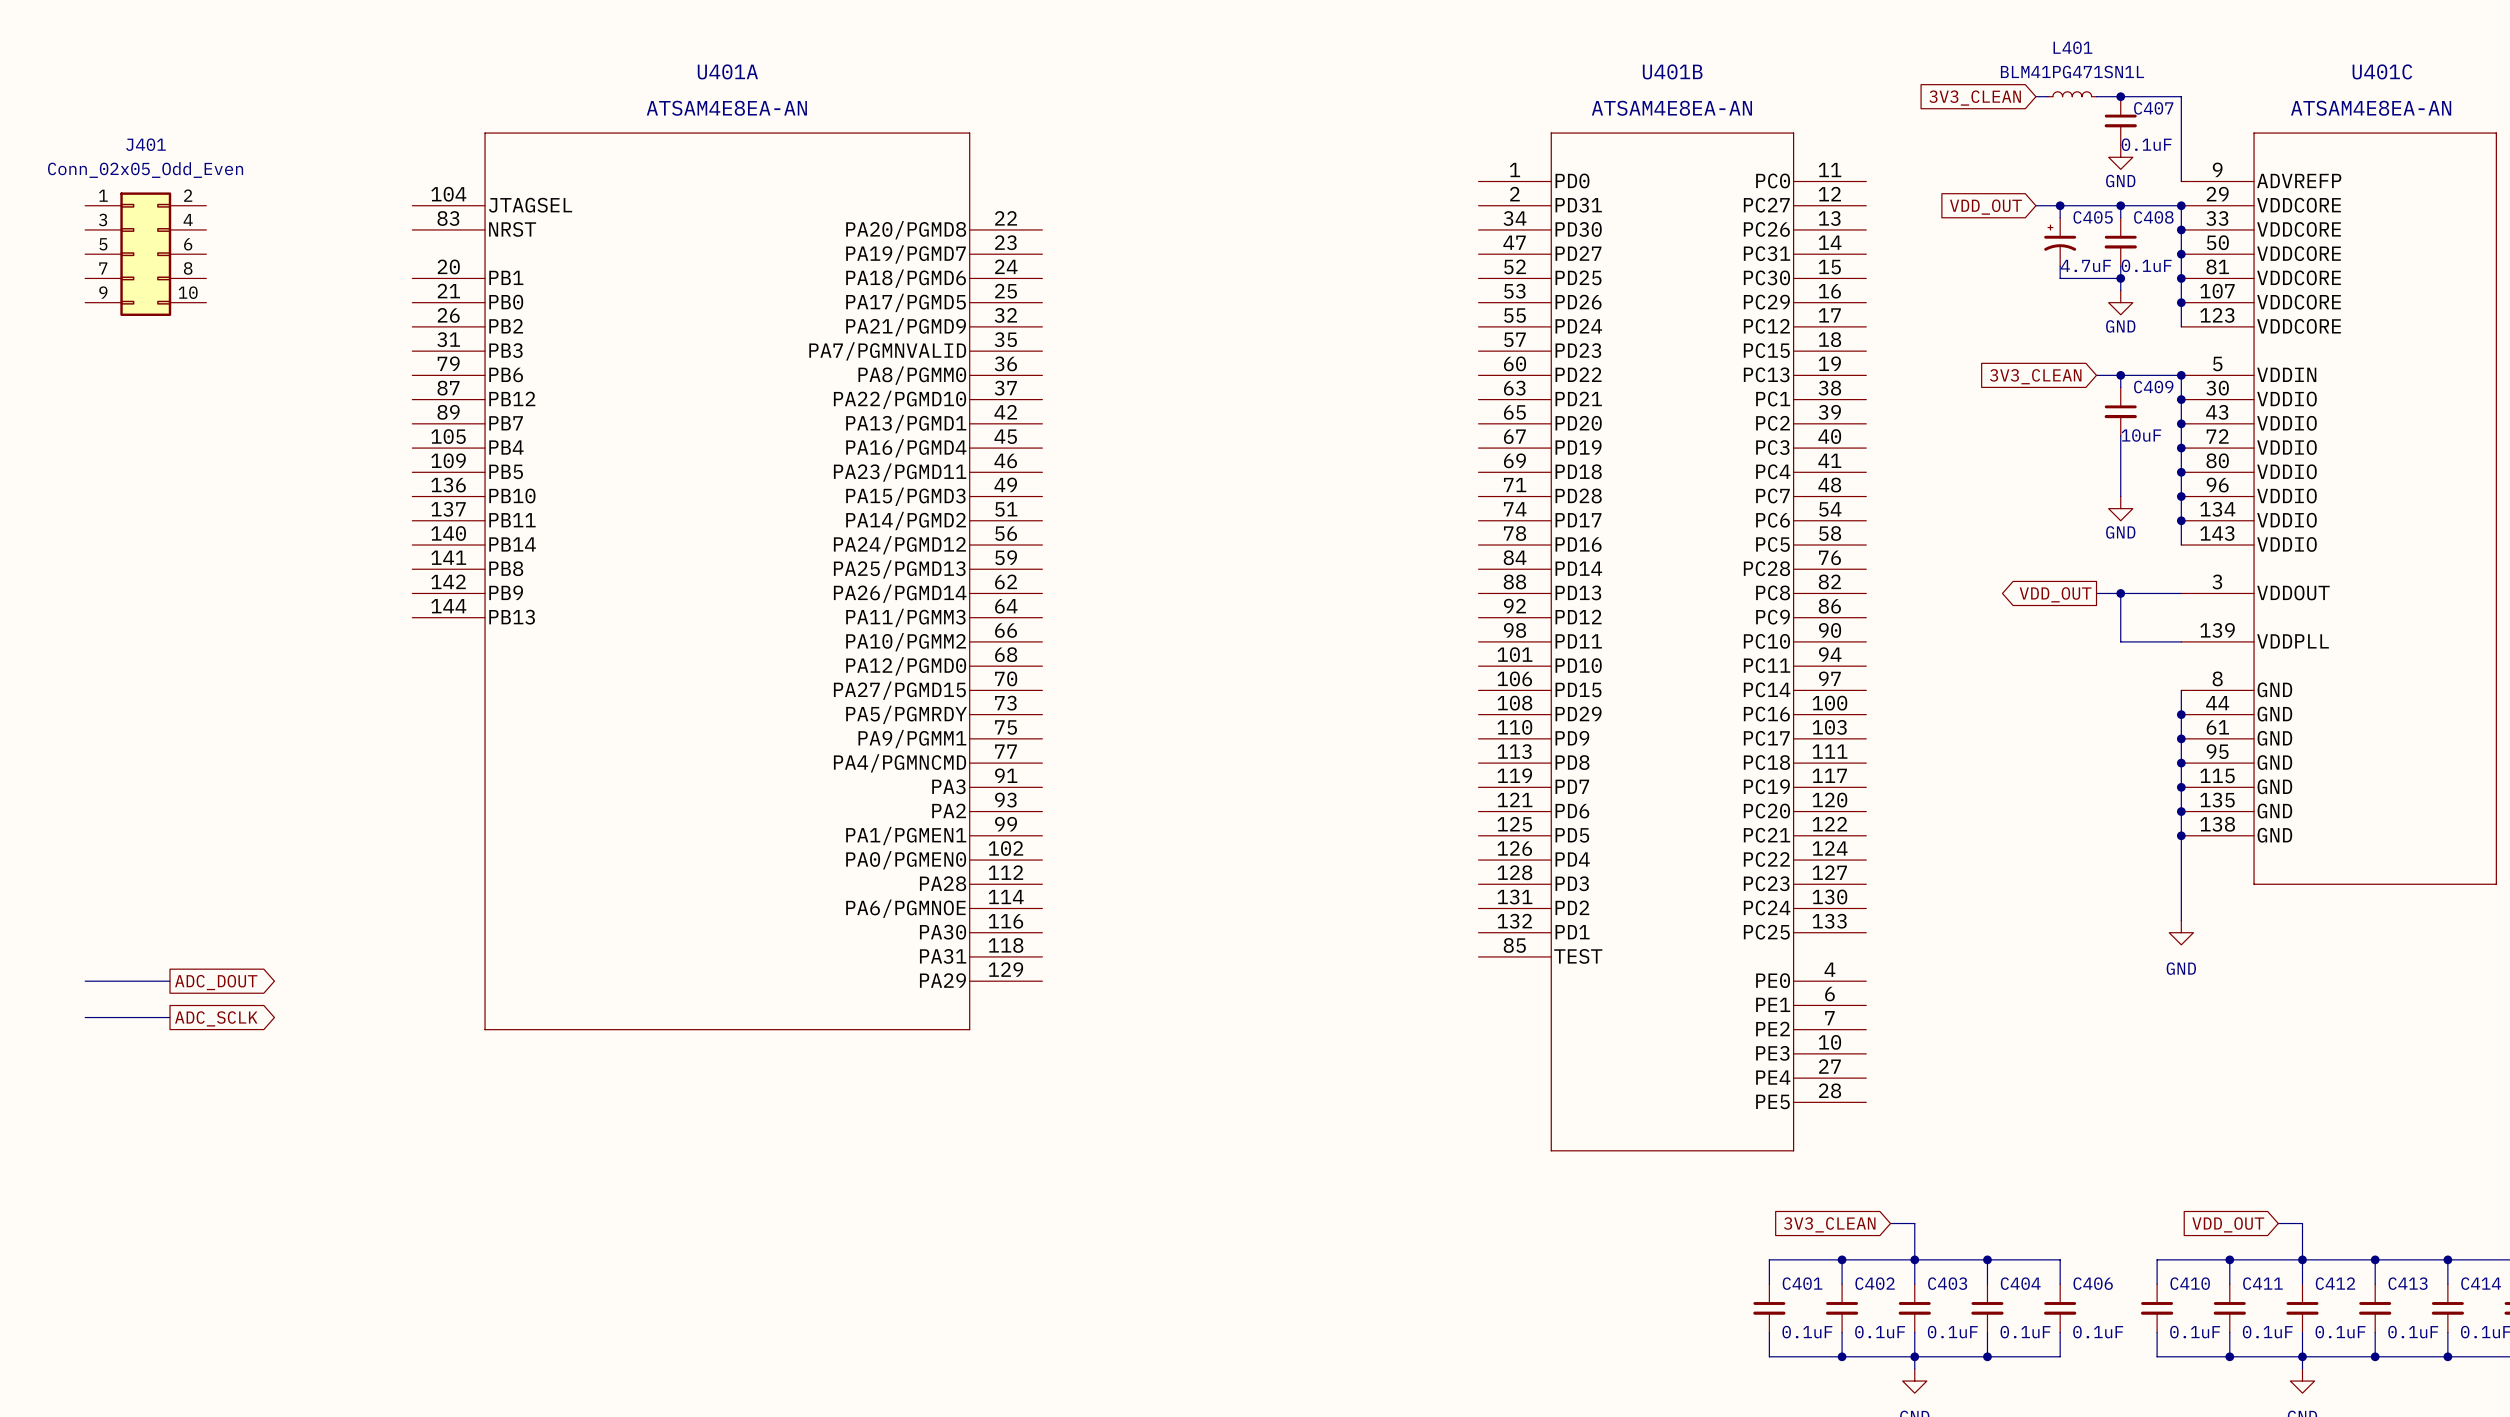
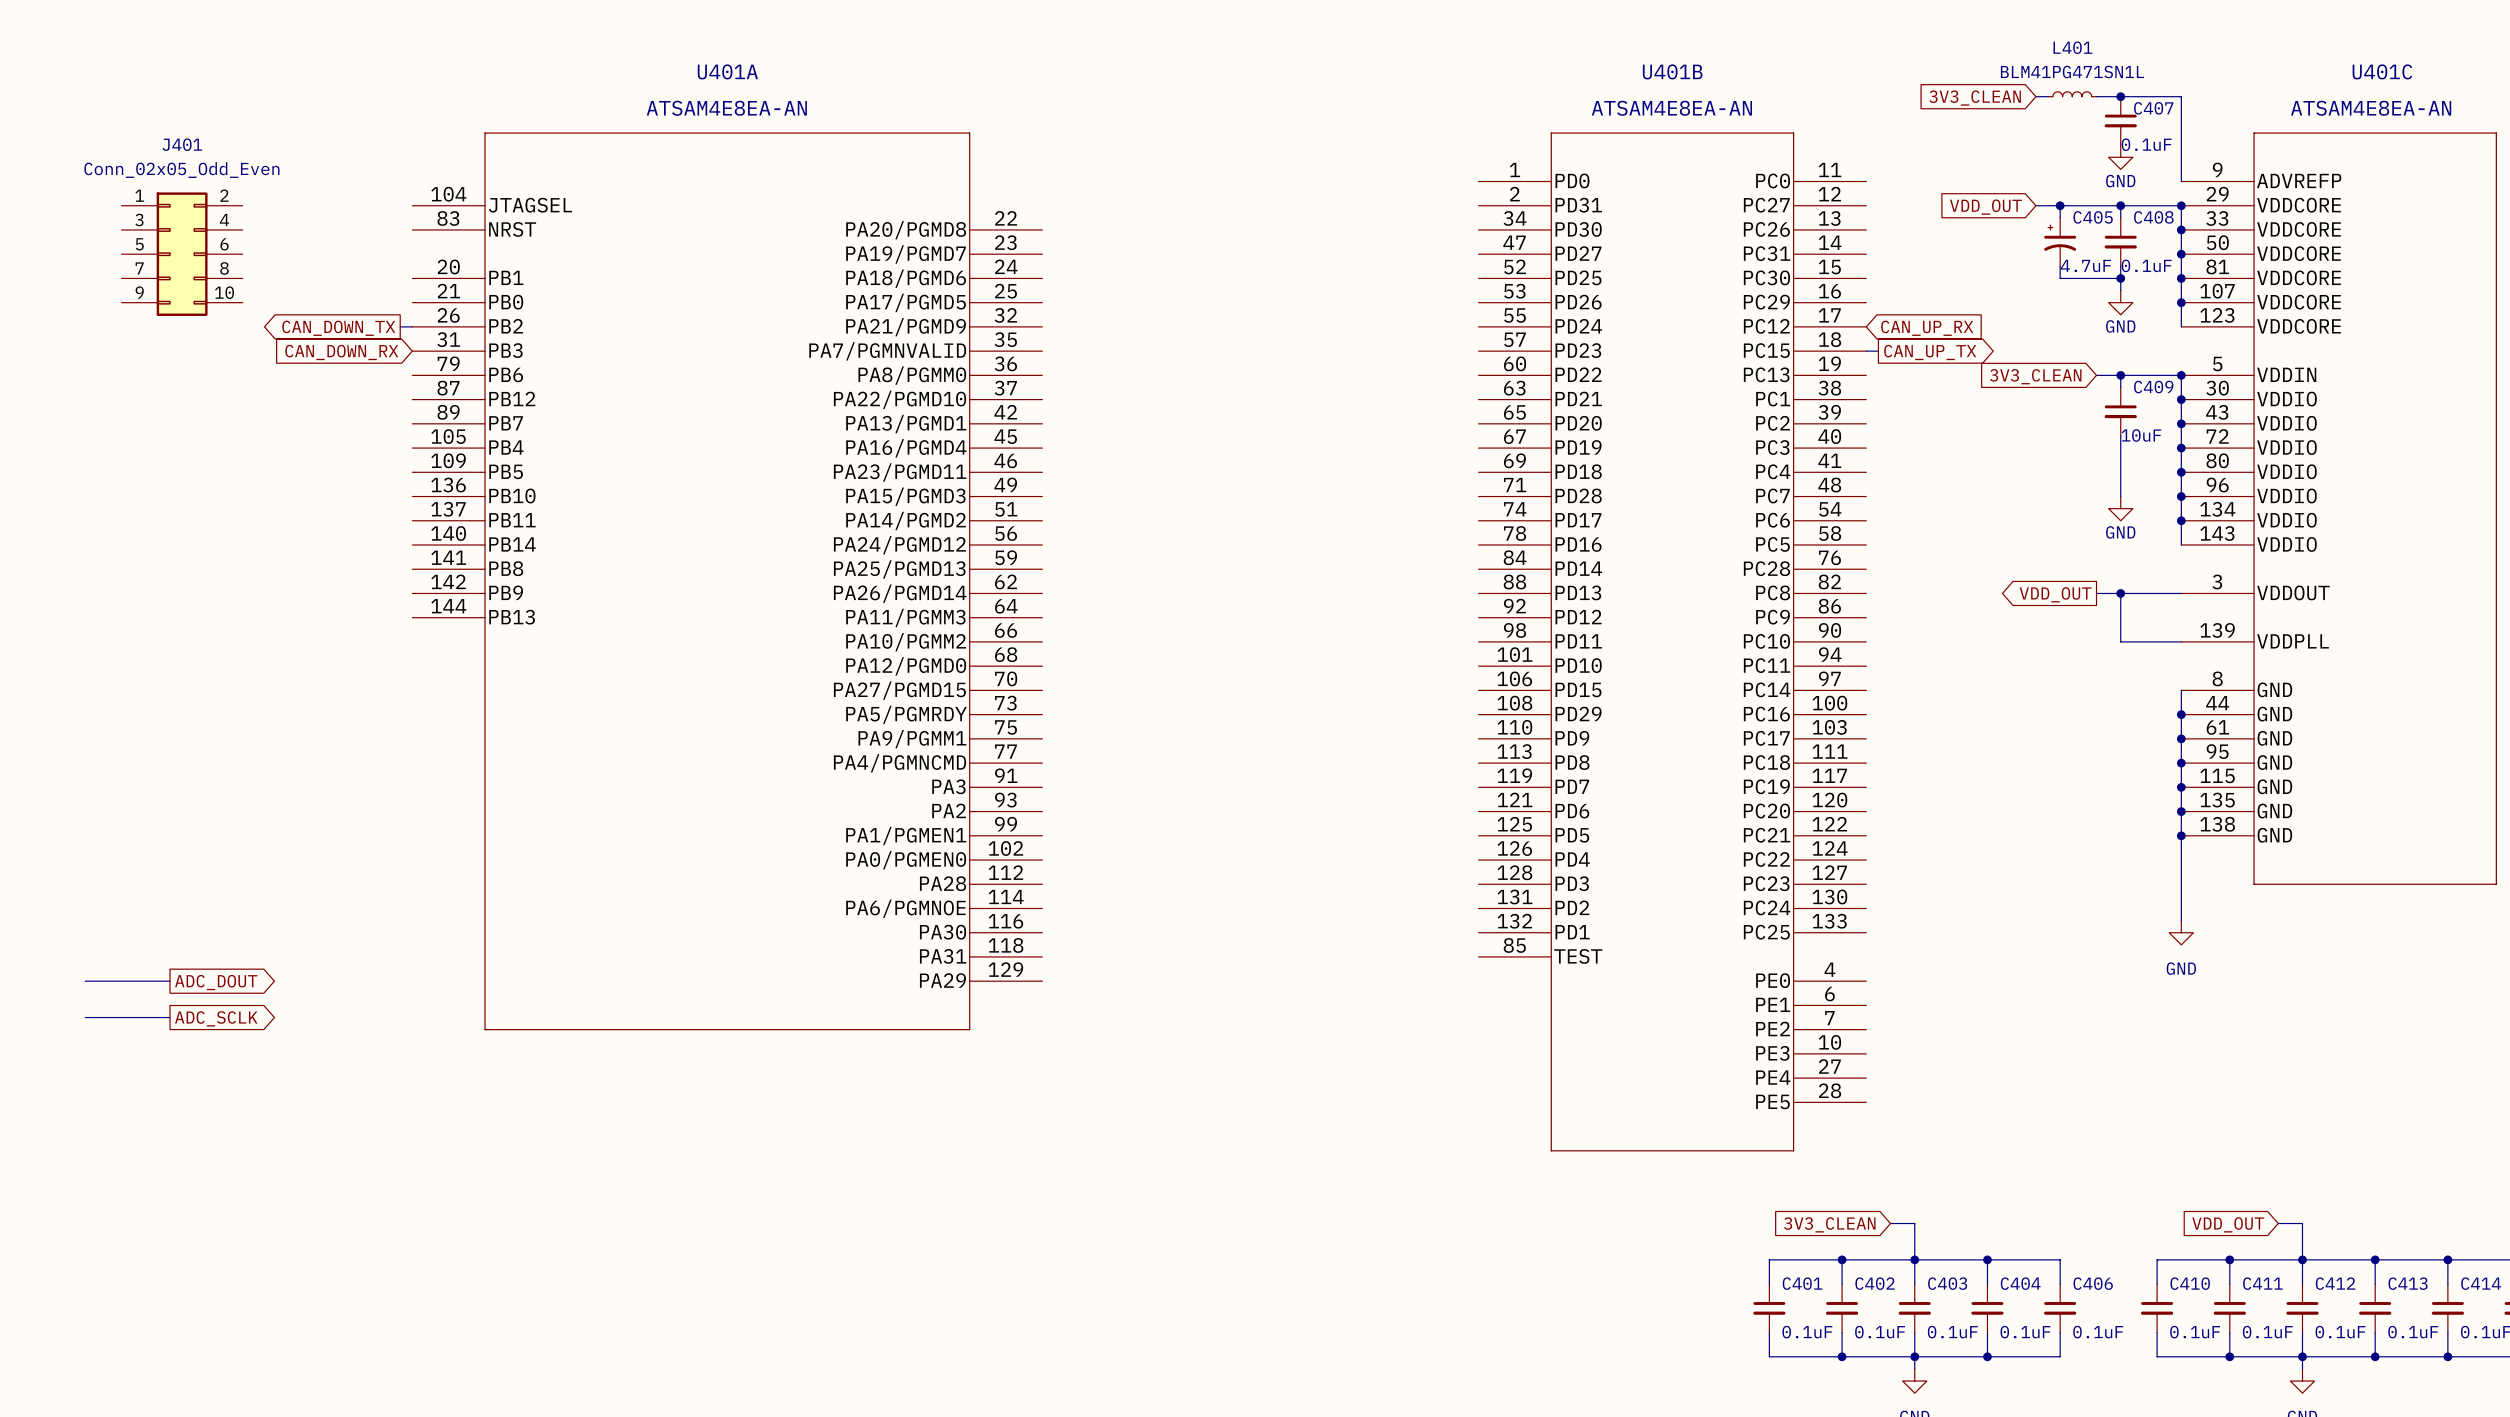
J401 position: (145, 254) -> (182, 254)
wire: none -> (400, 326) (412, 326)
global label: none -> CAN_DOWN_TX (338, 328)
global label: none -> CAN_UP_RX (1927, 328)
wire: none -> (1866, 351) (1878, 351)
global label: none -> CAN_DOWN_RX (341, 352)
global label: none -> CAN_UP_TX (1930, 352)

